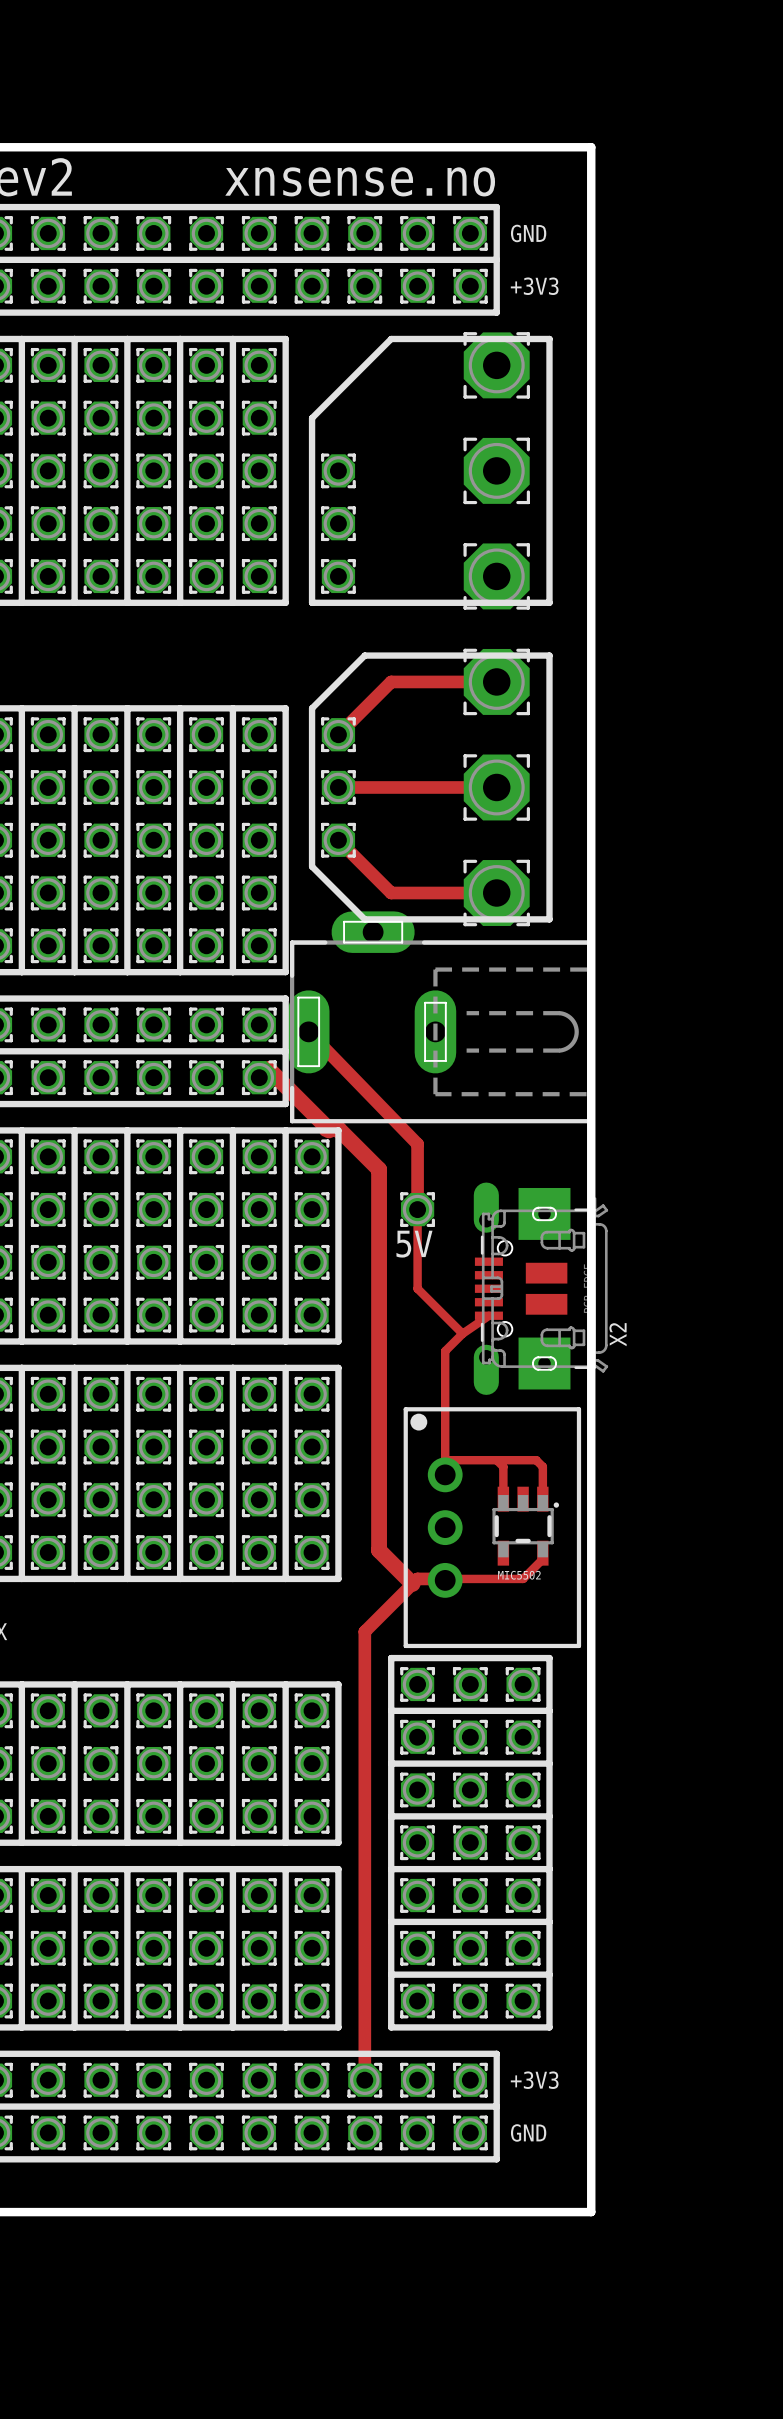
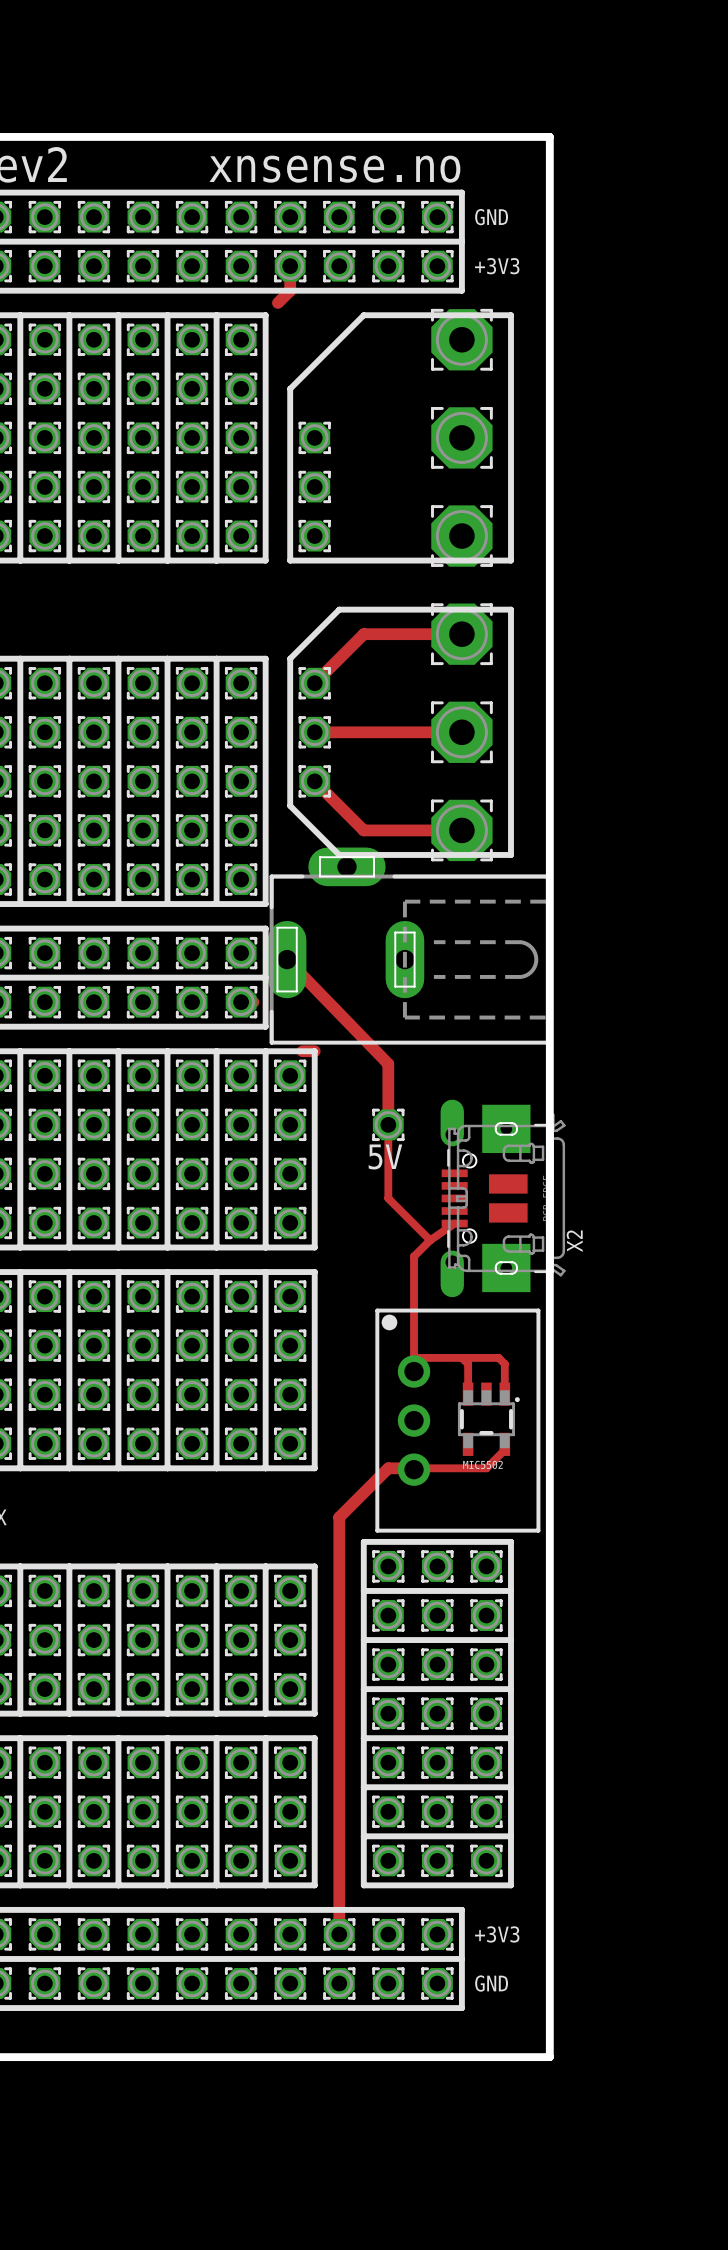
track: none -> (290, 266) (290, 290) (277, 302)
track: (259, 1077) (268, 1069) (328, 1130) -> none
track: (338, 1130) (379, 1169) (379, 1550) (412, 1583) -> none

